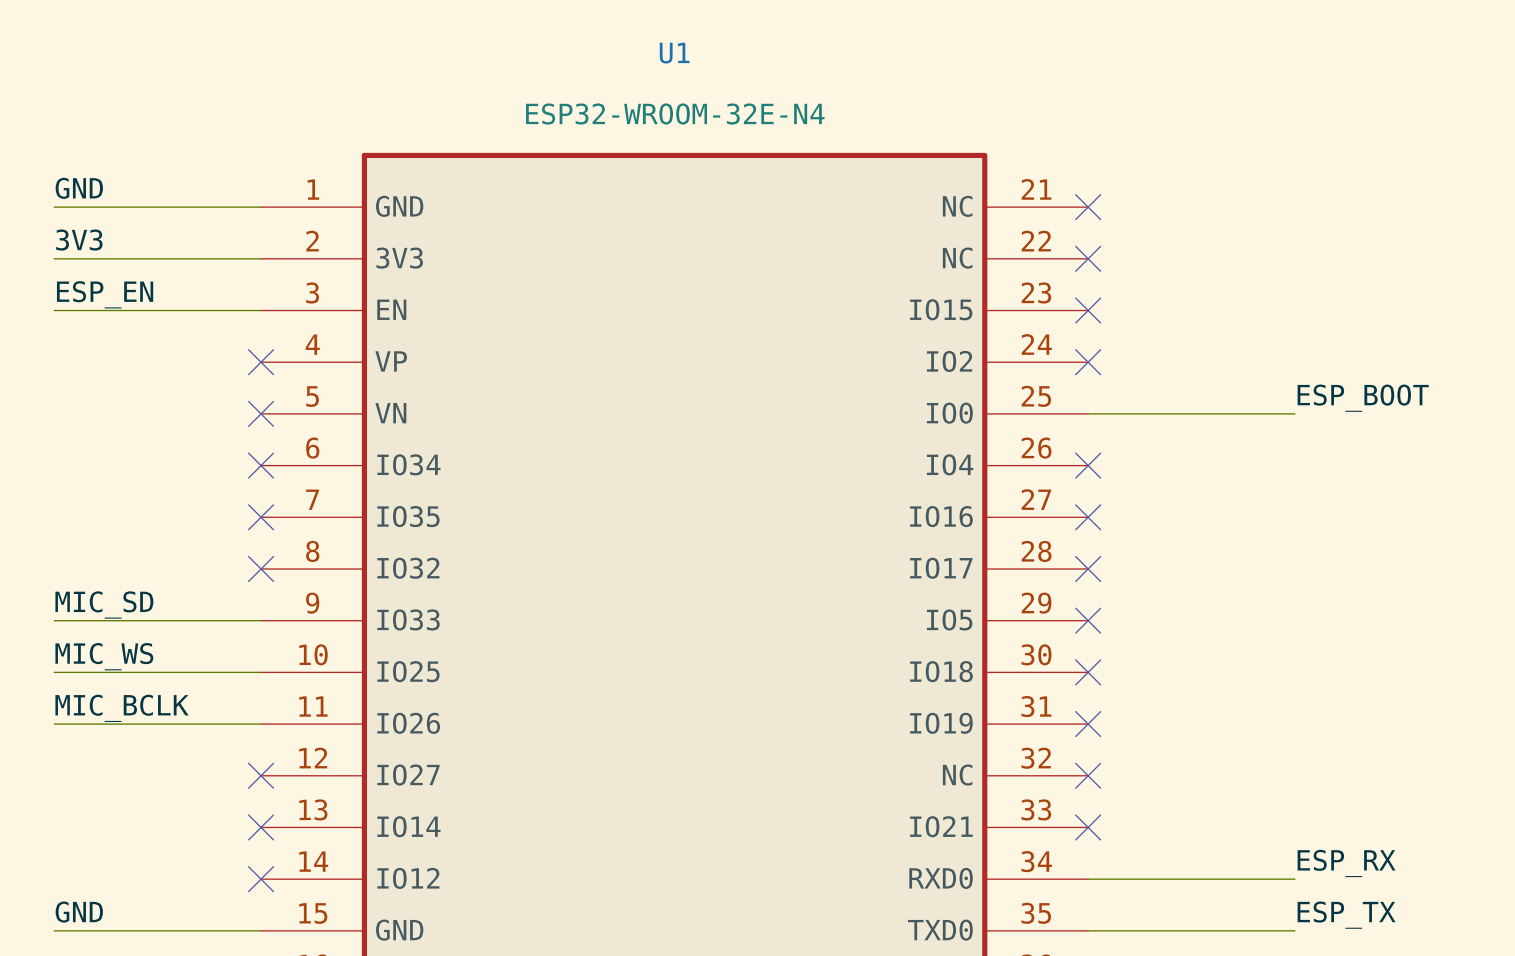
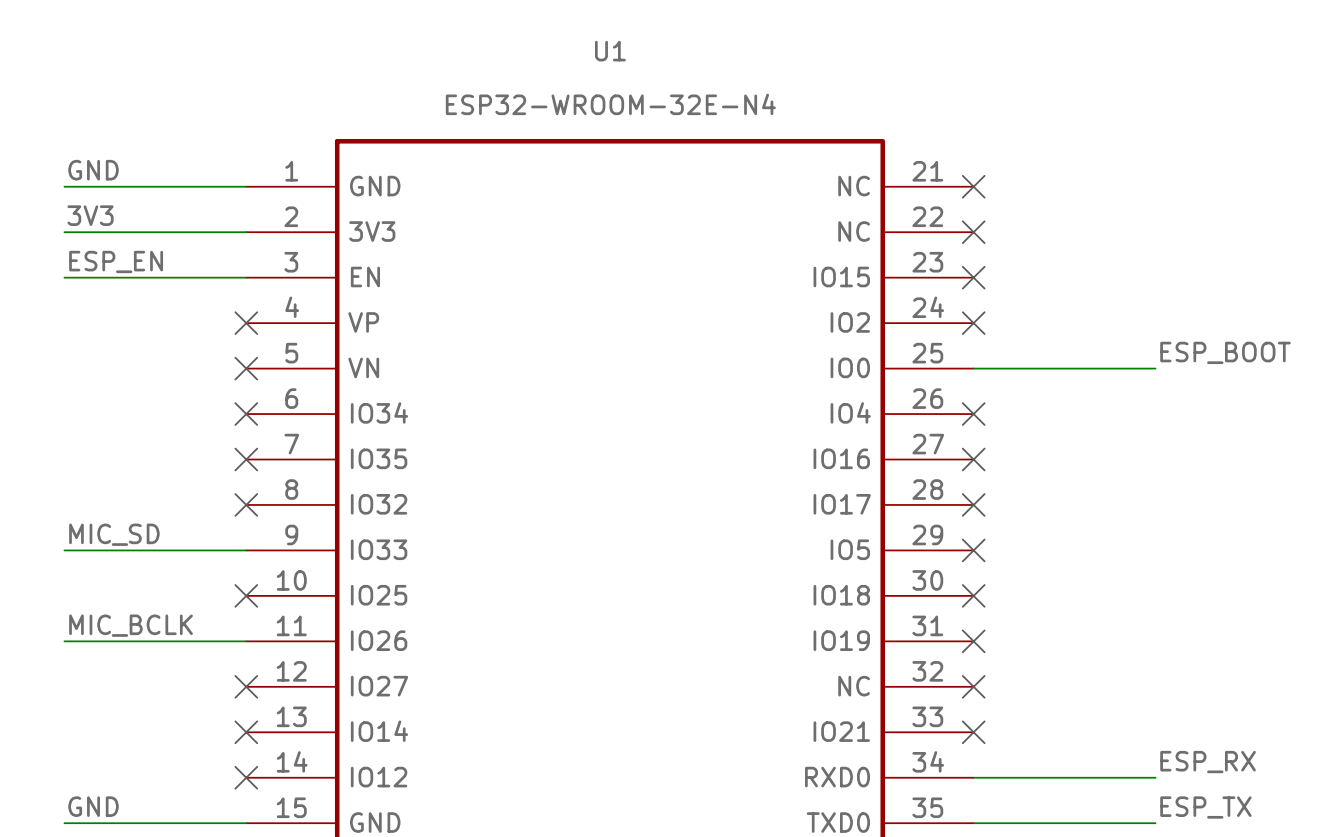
label: MIC_WS (104, 656) -> none
wire: (54, 672) (261, 672) -> none
no-connect mark: none -> (246, 595)

